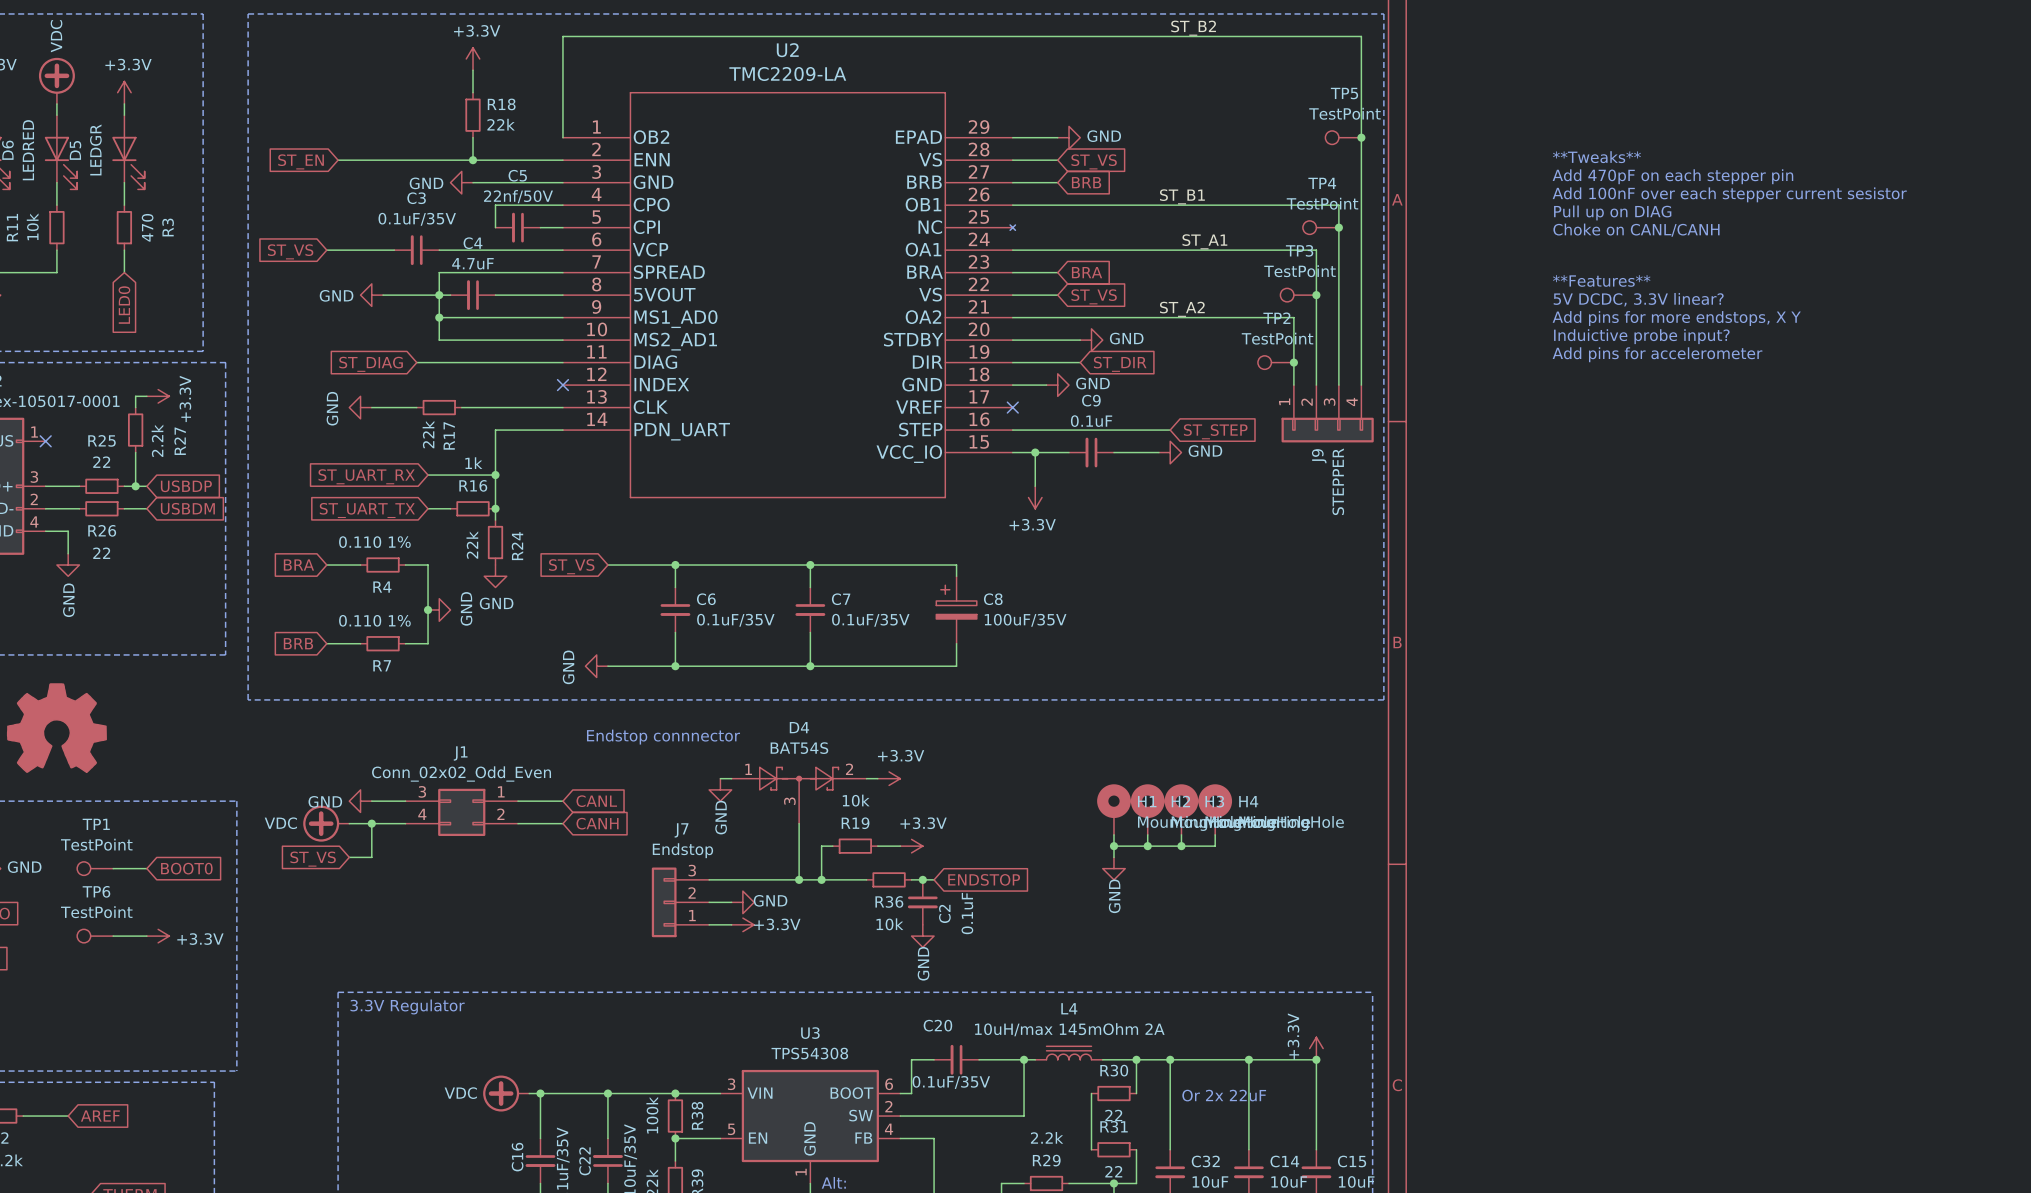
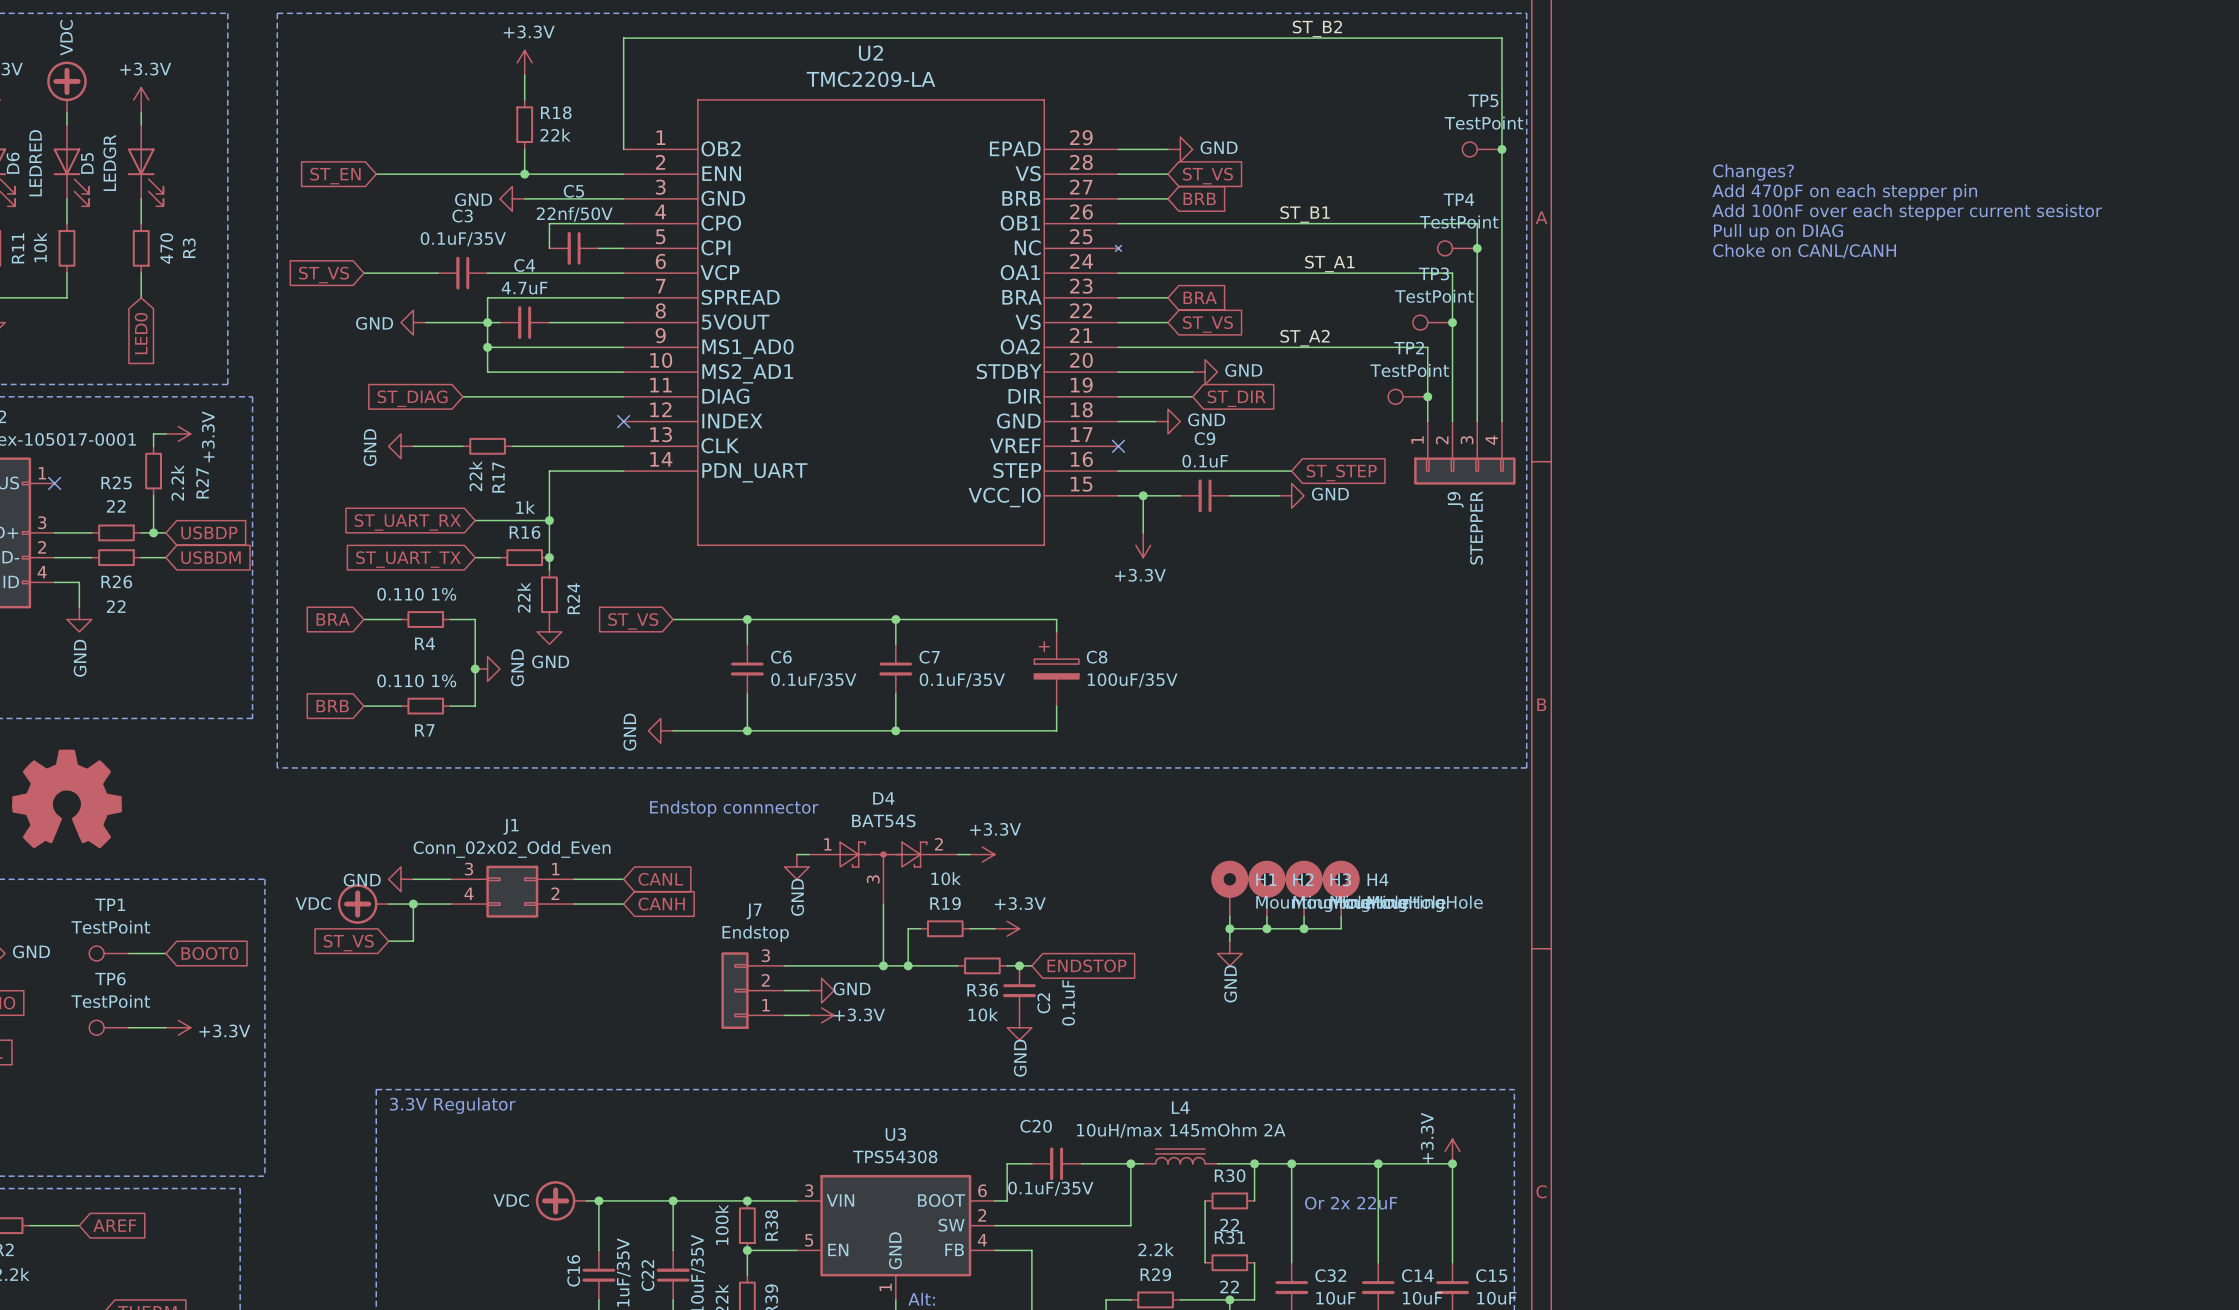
text: **Tweaks** (1596, 157) -> Changes? (1753, 172)
text: **Features** (1601, 280) -> none
text: 5V DCDC, 3.3V linear? (1638, 299) -> none
text: Add pins for more endstops, X Y (1676, 318) -> none
text: Induictive probe input? (1641, 336) -> none
text: Add pins for accelerometer (1657, 354) -> none

